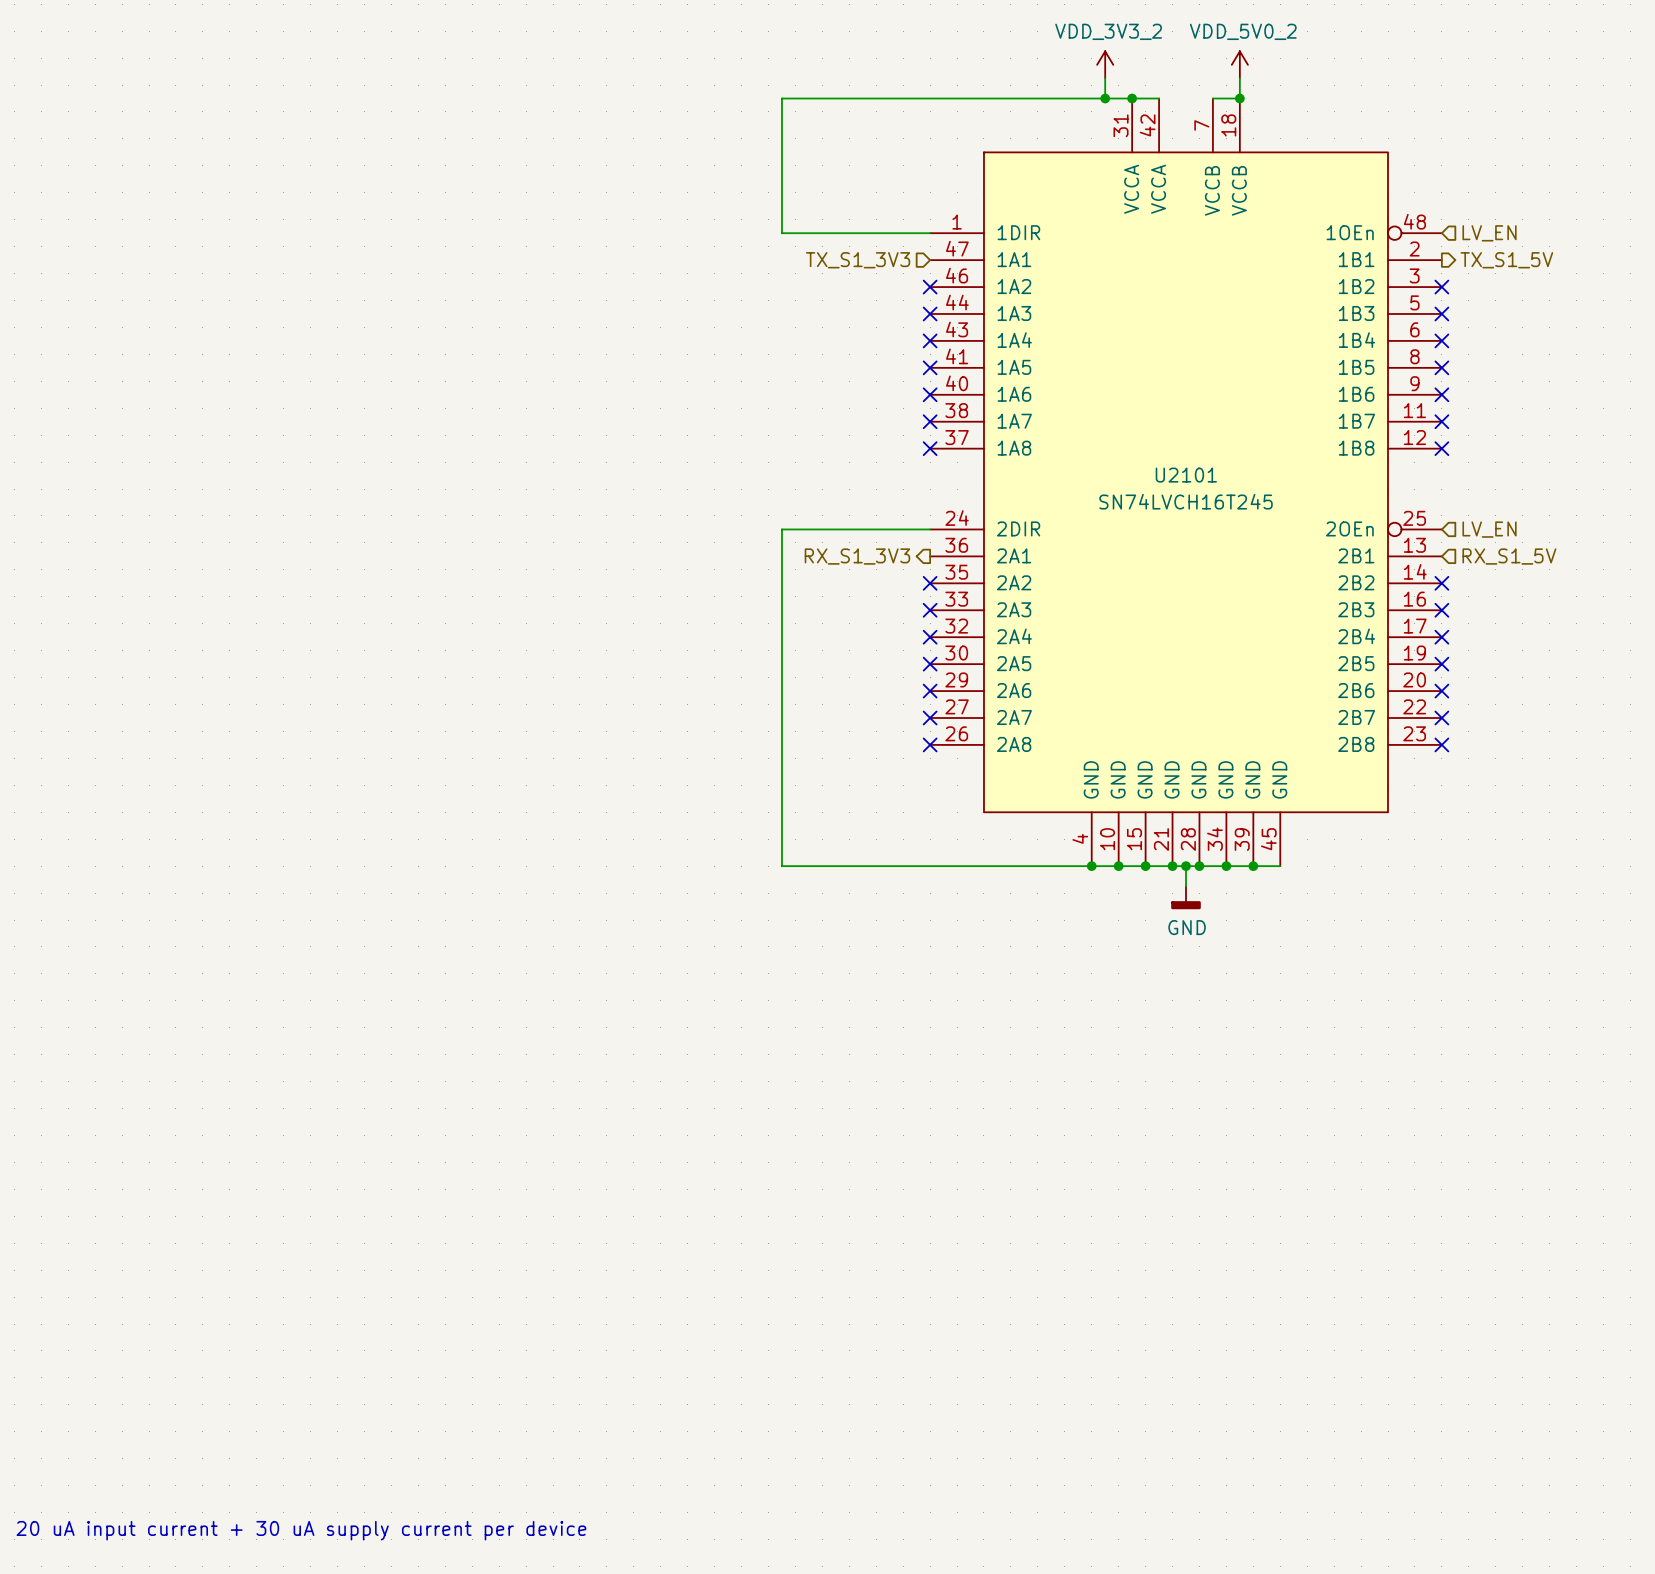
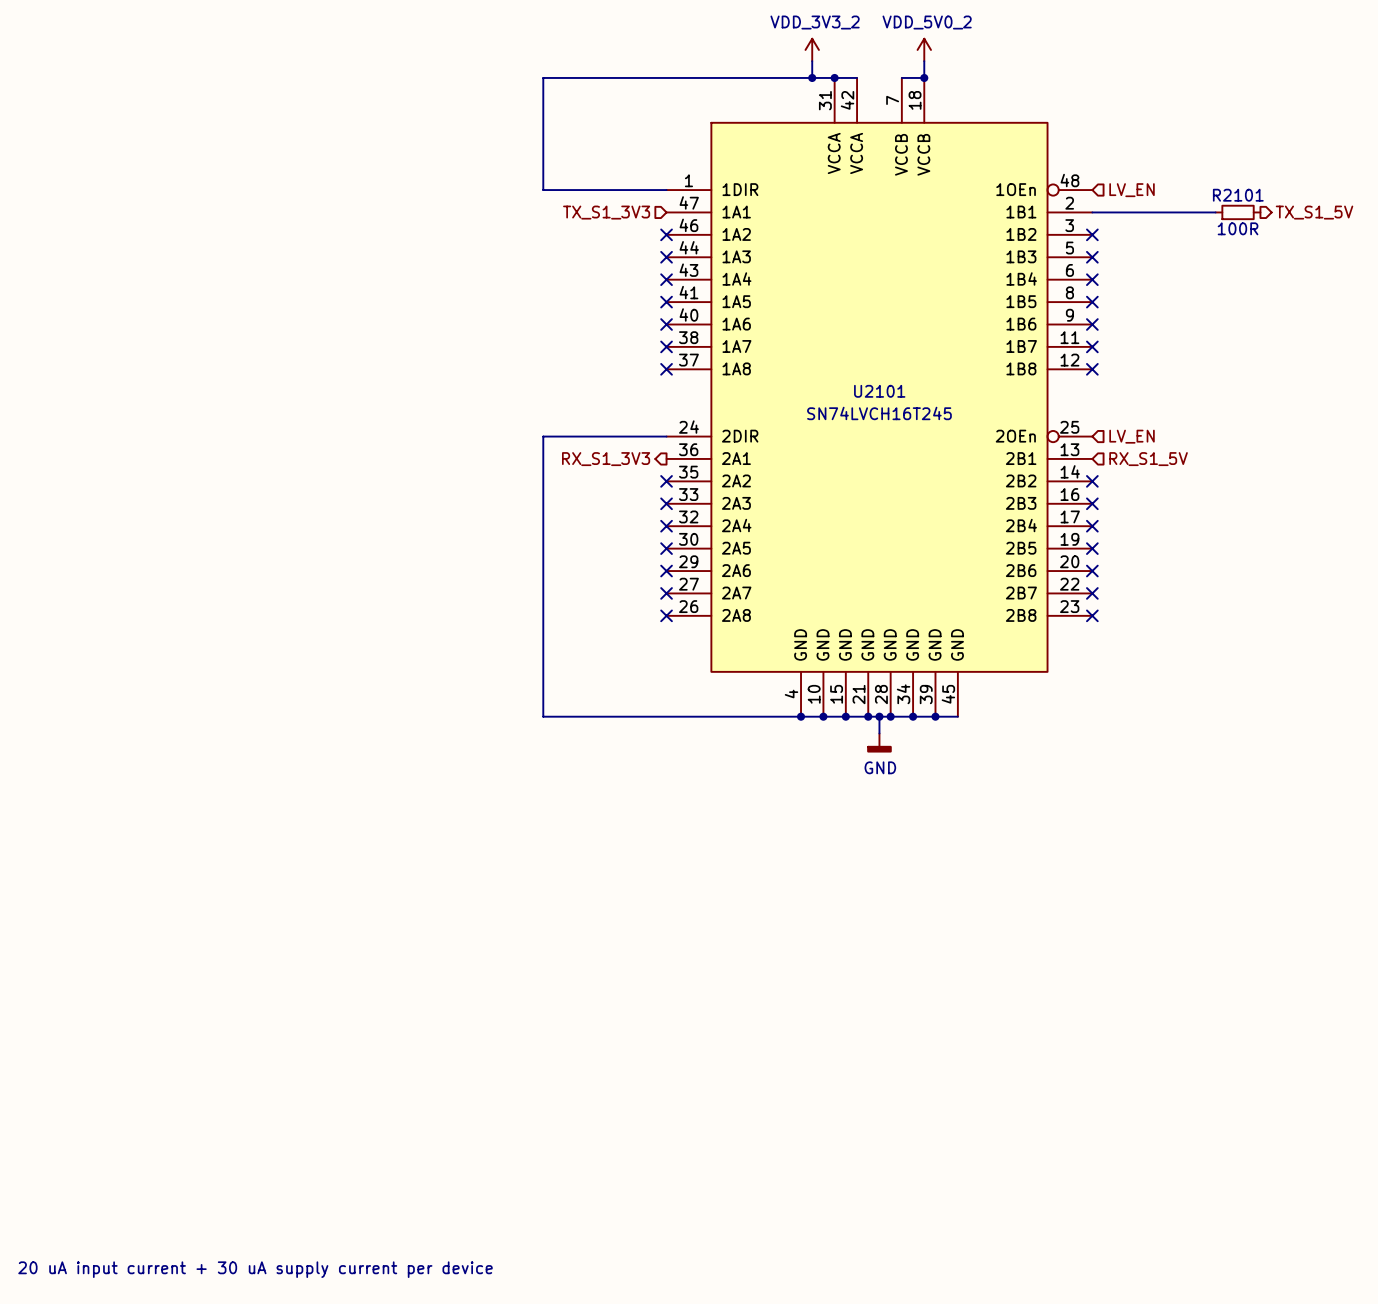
power symbol: none -> VDD_3V3_2 (812, 49)
power symbol: VDD_3V3_2 (1105, 64) -> VDD_5V0_2 (924, 49)
power symbol: VDD_5V0_2 (1239, 64) -> none
wire: none -> (812, 61) (812, 77)
wire: (1239, 78) (1239, 98) (1212, 98) -> none
wire: (781, 98) (781, 233) -> (655, 77) (543, 77) (543, 190) (655, 190)
junction: none -> (812, 77)
junction: none -> (834, 77)
wire: (1024, 98) (1078, 98) -> none
wire: (1105, 98) (1159, 98) -> none
junction: (1132, 98) -> none
junction: (1239, 98) -> none
hierarchical label position: LV_EN (1489, 233) -> LV_EN (1132, 190)
hierarchical label position: TX_S1_3V3 (858, 260) -> TX_S1_3V3 (606, 212)
R2101: none -> 100R (1238, 212)
hierarchical label position: TX_S1_5V (1506, 260) -> TX_S1_5V (1314, 212)
no-connect mark: none -> (666, 234)
no-connect mark: (930, 287) -> none
no-connect mark: none -> (1092, 234)
no-connect mark: (1441, 287) -> none
no-connect mark: none -> (666, 257)
no-connect mark: (930, 313) -> none
no-connect mark: none -> (1092, 257)
no-connect mark: (1441, 313) -> none
no-connect mark: none -> (666, 279)
no-connect mark: (930, 340) -> none
no-connect mark: none -> (1092, 279)
no-connect mark: (1441, 340) -> none
no-connect mark: none -> (666, 302)
no-connect mark: (930, 367) -> none
no-connect mark: none -> (1092, 302)
no-connect mark: (1441, 367) -> none
no-connect mark: none -> (666, 324)
no-connect mark: (930, 394) -> none
no-connect mark: none -> (1092, 324)
no-connect mark: (1441, 394) -> none
no-connect mark: none -> (666, 346)
no-connect mark: (930, 421) -> none
no-connect mark: none -> (1092, 346)
no-connect mark: (1441, 421) -> none
no-connect mark: none -> (666, 369)
no-connect mark: (930, 448) -> none
no-connect mark: none -> (1092, 369)
no-connect mark: (1441, 448) -> none
U2101 position: (1186, 482) -> (879, 397)
wire: (781, 529) (781, 866) -> (655, 436) (543, 436) (543, 716) (655, 716)
hierarchical label position: LV_EN (1489, 529) -> LV_EN (1132, 436)
hierarchical label position: RX_S1_3V3 (857, 556) -> RX_S1_3V3 (606, 459)
hierarchical label position: RX_S1_5V (1509, 556) -> RX_S1_5V (1148, 459)
no-connect mark: none -> (666, 481)
no-connect mark: (930, 583) -> none
no-connect mark: none -> (1092, 481)
no-connect mark: (1441, 583) -> none
no-connect mark: none -> (666, 503)
no-connect mark: (930, 610) -> none
no-connect mark: none -> (1092, 503)
no-connect mark: (1441, 610) -> none
no-connect mark: none -> (666, 526)
no-connect mark: (930, 637) -> none
no-connect mark: none -> (1092, 526)
no-connect mark: (1441, 637) -> none
no-connect mark: none -> (666, 548)
no-connect mark: (930, 664) -> none
no-connect mark: none -> (1092, 548)
no-connect mark: (1441, 664) -> none
no-connect mark: none -> (666, 571)
no-connect mark: (930, 691) -> none
no-connect mark: none -> (1092, 571)
no-connect mark: (1441, 691) -> none
no-connect mark: none -> (666, 593)
no-connect mark: (930, 718) -> none
no-connect mark: none -> (1092, 593)
no-connect mark: (1441, 718) -> none
no-connect mark: none -> (666, 615)
no-connect mark: (930, 744) -> none
no-connect mark: none -> (1092, 615)
no-connect mark: (1441, 744) -> none
junction: none -> (801, 716)
junction: none -> (823, 716)
junction: none -> (845, 716)
junction: none -> (868, 716)
junction: none -> (879, 716)
junction: none -> (890, 716)
wire: (1145, 866) (1280, 866) -> none
junction: (1145, 866) -> none
junction: (1172, 866) -> none
wire: (1186, 866) (1186, 886) -> (879, 716) (879, 733)
junction: (1186, 866) -> none
junction: (1199, 866) -> none
junction: (1226, 866) -> none
junction: (1253, 866) -> none
power symbol position: GND (1186, 897) -> GND (879, 743)

